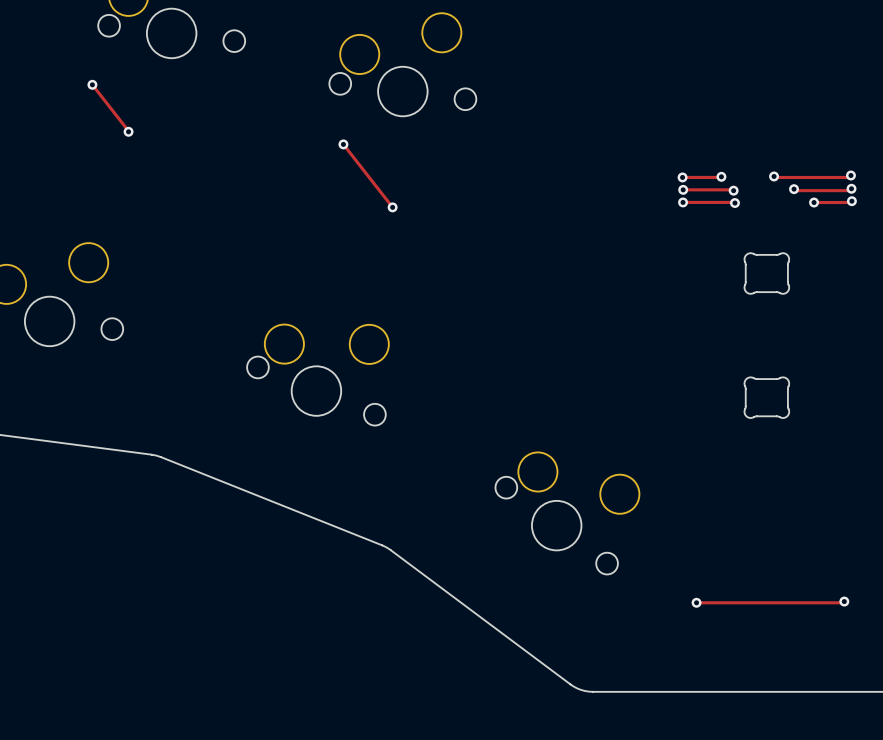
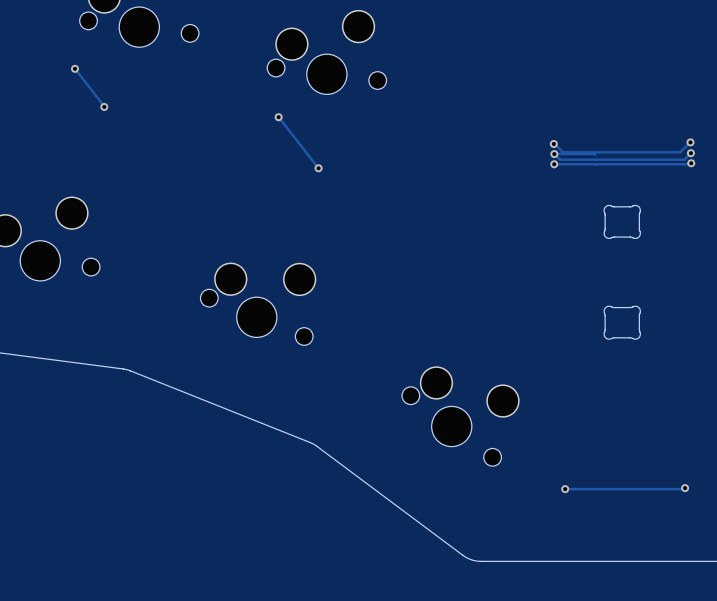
track: (850, 175) (848, 177) (774, 176) -> none
track: (721, 176) (683, 177) -> (690, 142) (679, 152) (562, 152) (554, 143)
via: (721, 176) -> none
via: (774, 176) -> none
track: (794, 189) (849, 190) -> (554, 154) (560, 159) (684, 159) (689, 154)
via: (794, 189) -> none
via: (733, 190) -> none
track: (814, 202) (850, 202) -> (595, 164) (690, 164)
via: (814, 202) -> none
via: (734, 203) -> none

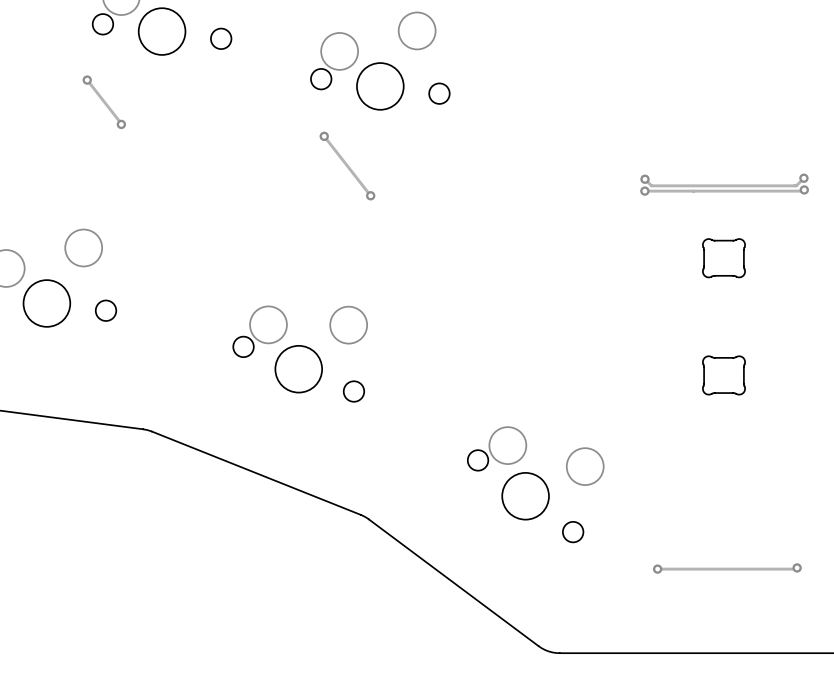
track: (690, 142) (679, 152) (562, 152) (553, 143) -> none
via: (690, 142) -> none
via: (553, 143) -> none
track: (554, 154) (595, 154) -> none

